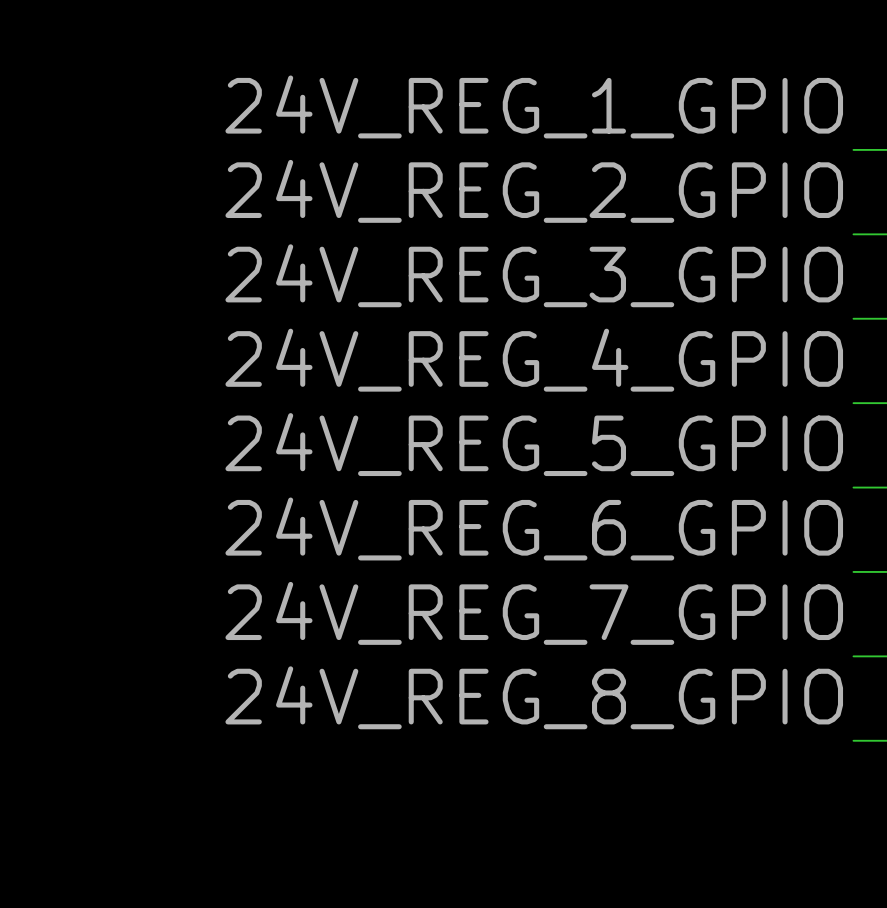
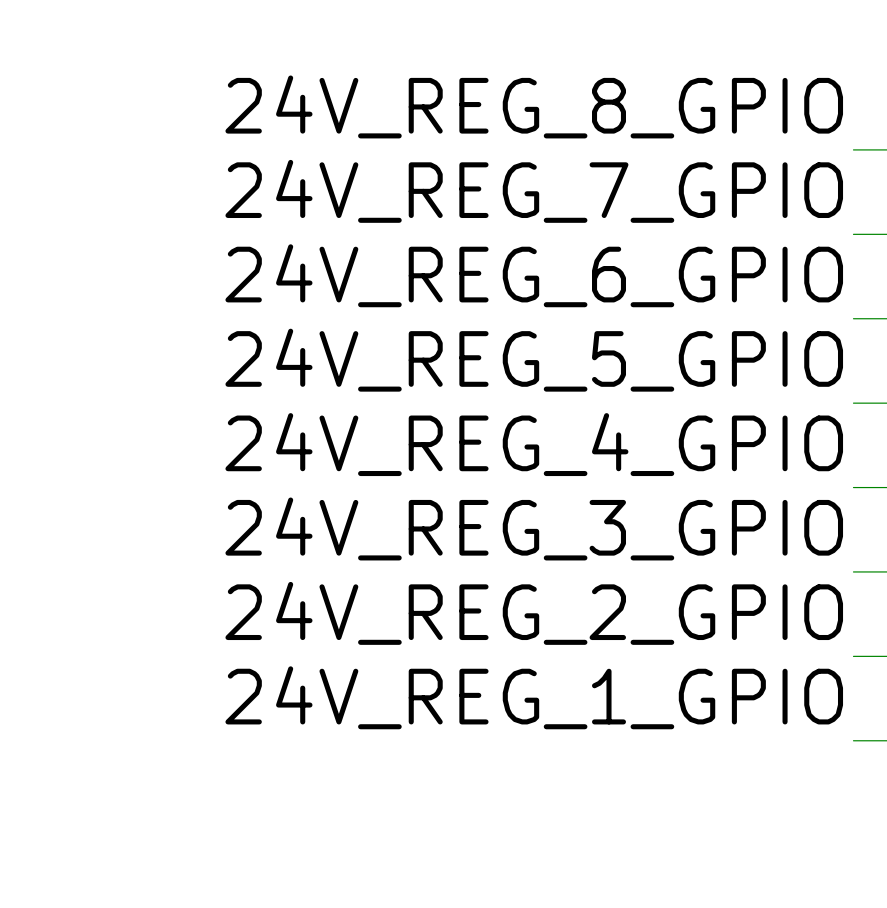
label: 24V_REG_1_GPIO (534, 106) -> 24V_REG_8_GPIO (534, 106)
label: 24V_REG_2_GPIO (534, 191) -> 24V_REG_7_GPIO (534, 191)
label: 24V_REG_3_GPIO (534, 275) -> 24V_REG_6_GPIO (534, 275)
label: 24V_REG_4_GPIO (534, 360) -> 24V_REG_5_GPIO (534, 360)
label: 24V_REG_5_GPIO (534, 444) -> 24V_REG_4_GPIO (534, 444)
label: 24V_REG_6_GPIO (534, 528) -> 24V_REG_3_GPIO (534, 528)
label: 24V_REG_7_GPIO (534, 613) -> 24V_REG_2_GPIO (534, 613)
label: 24V_REG_8_GPIO (534, 697) -> 24V_REG_1_GPIO (534, 697)

